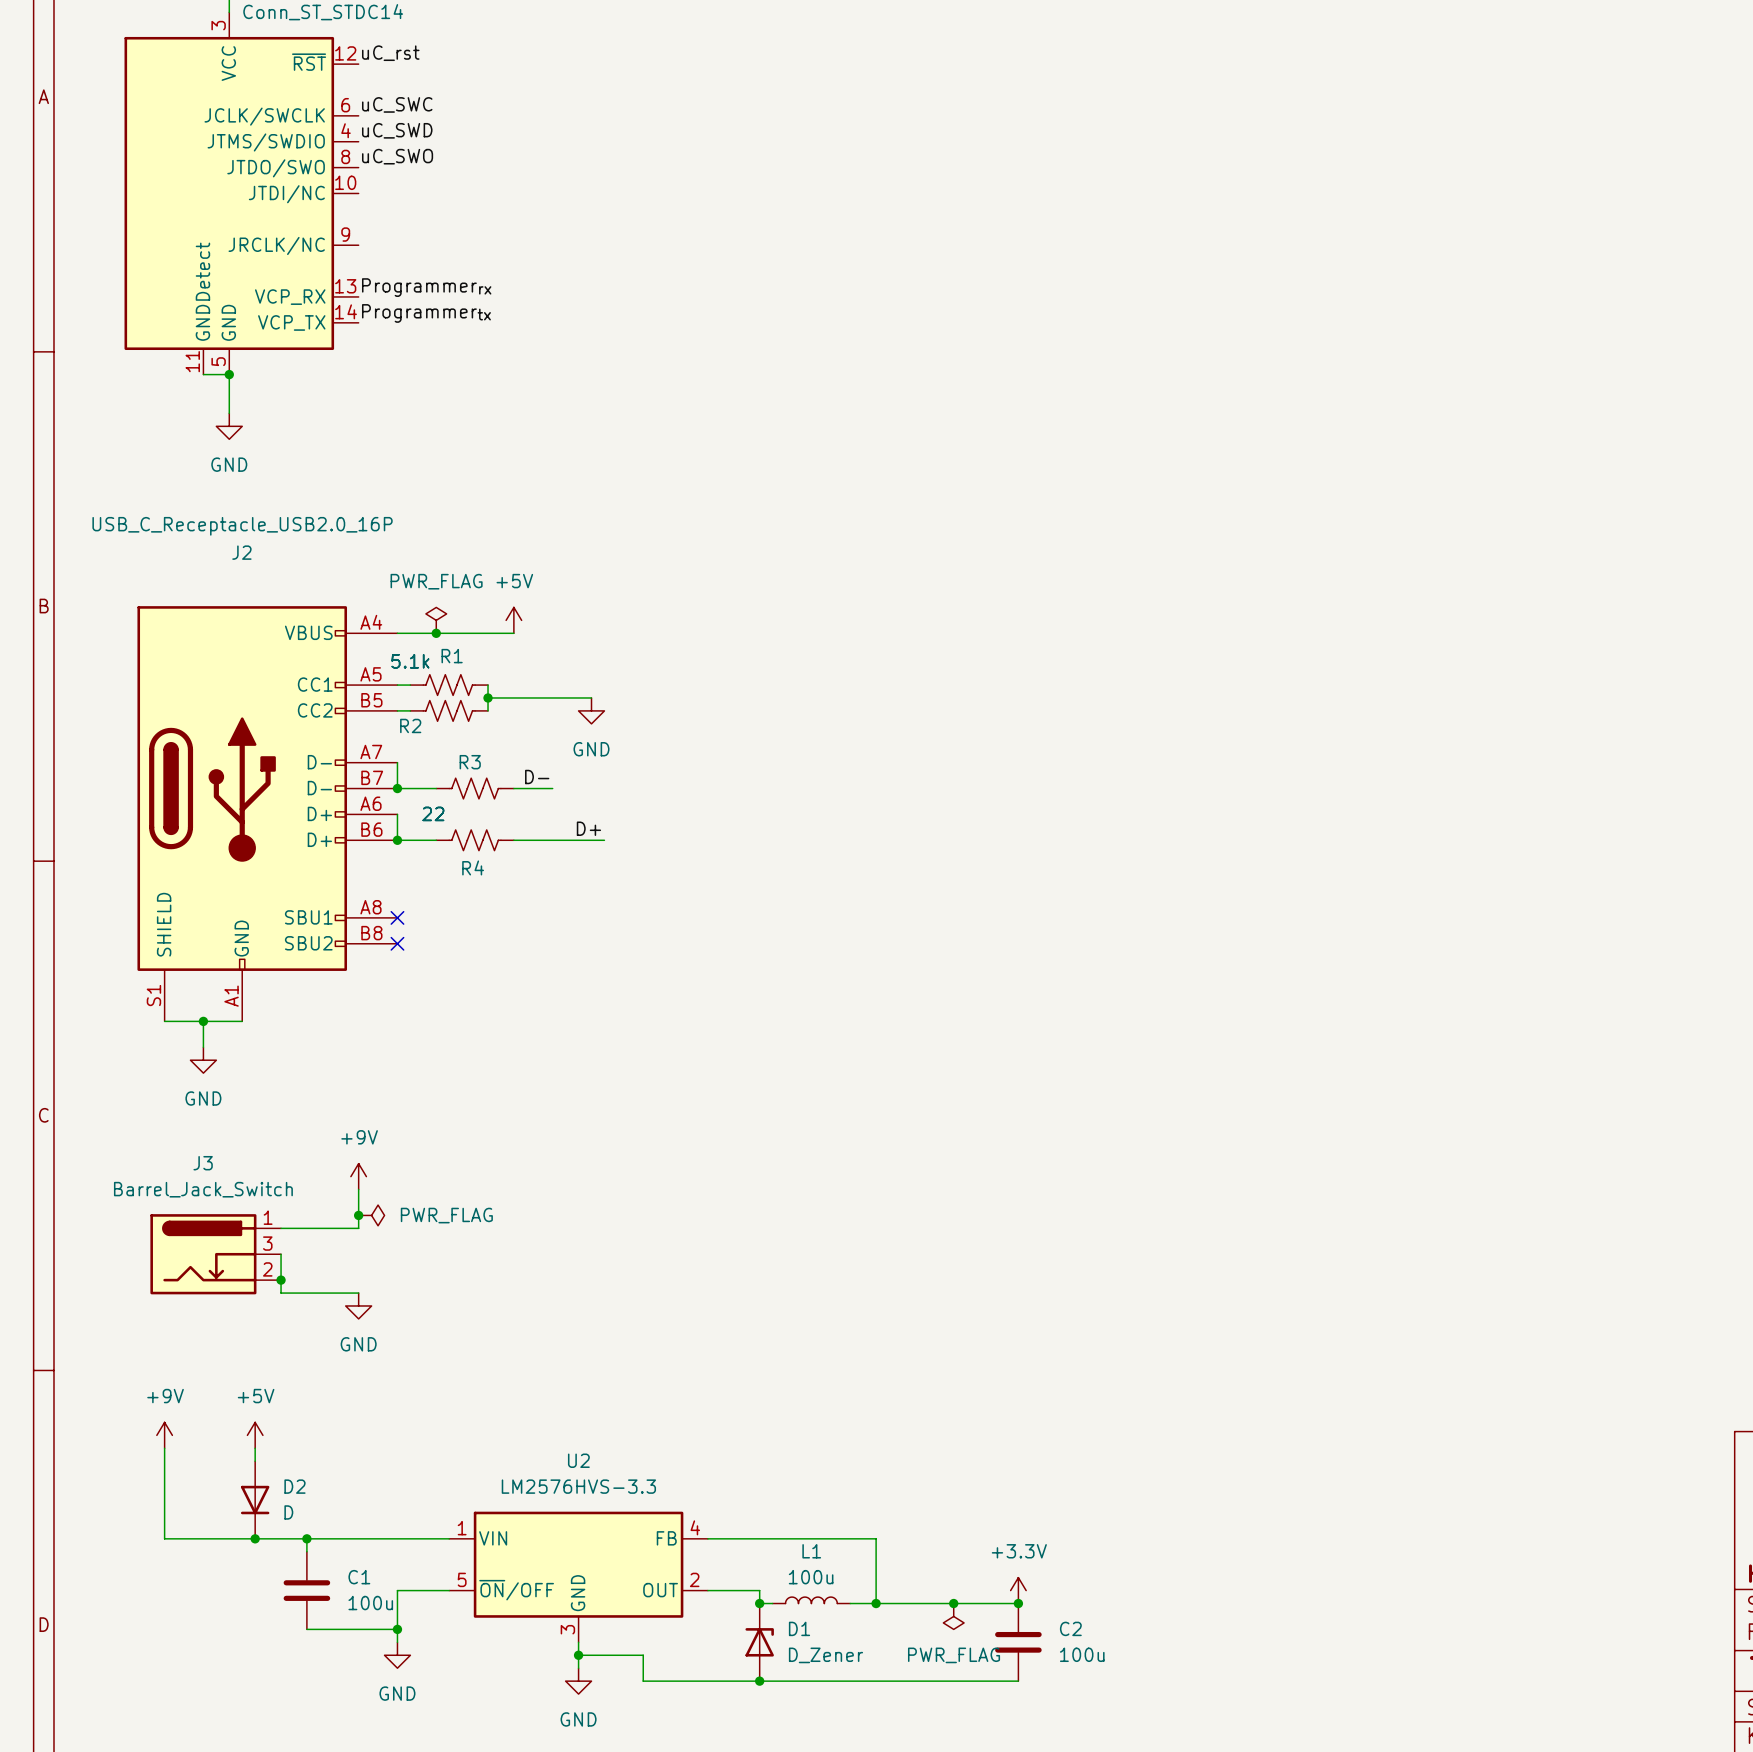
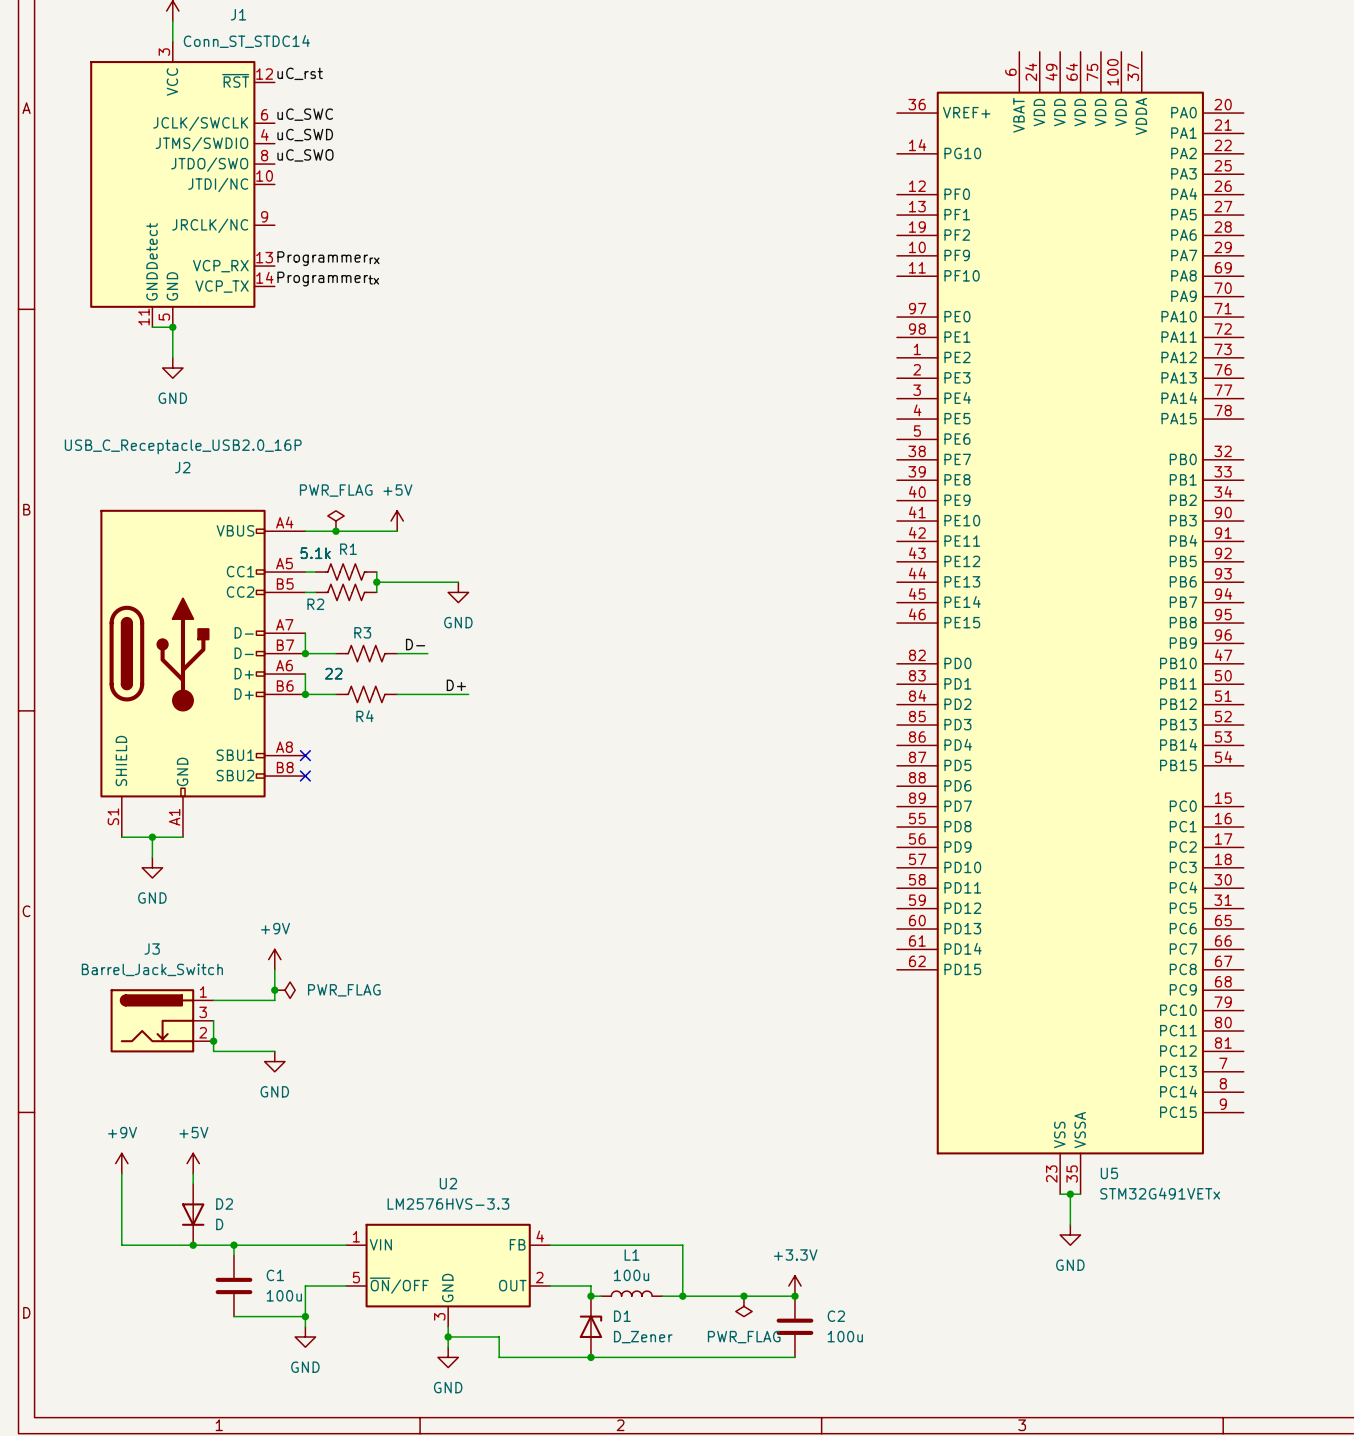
U5: none -> STM32G491VETx (1070, 623)
wire: none -> (1060, 1194) (1080, 1194)
wire: none -> (1070, 1194) (1070, 1224)
junction: none -> (1070, 1194)
power symbol: none -> GND (1070, 1234)

